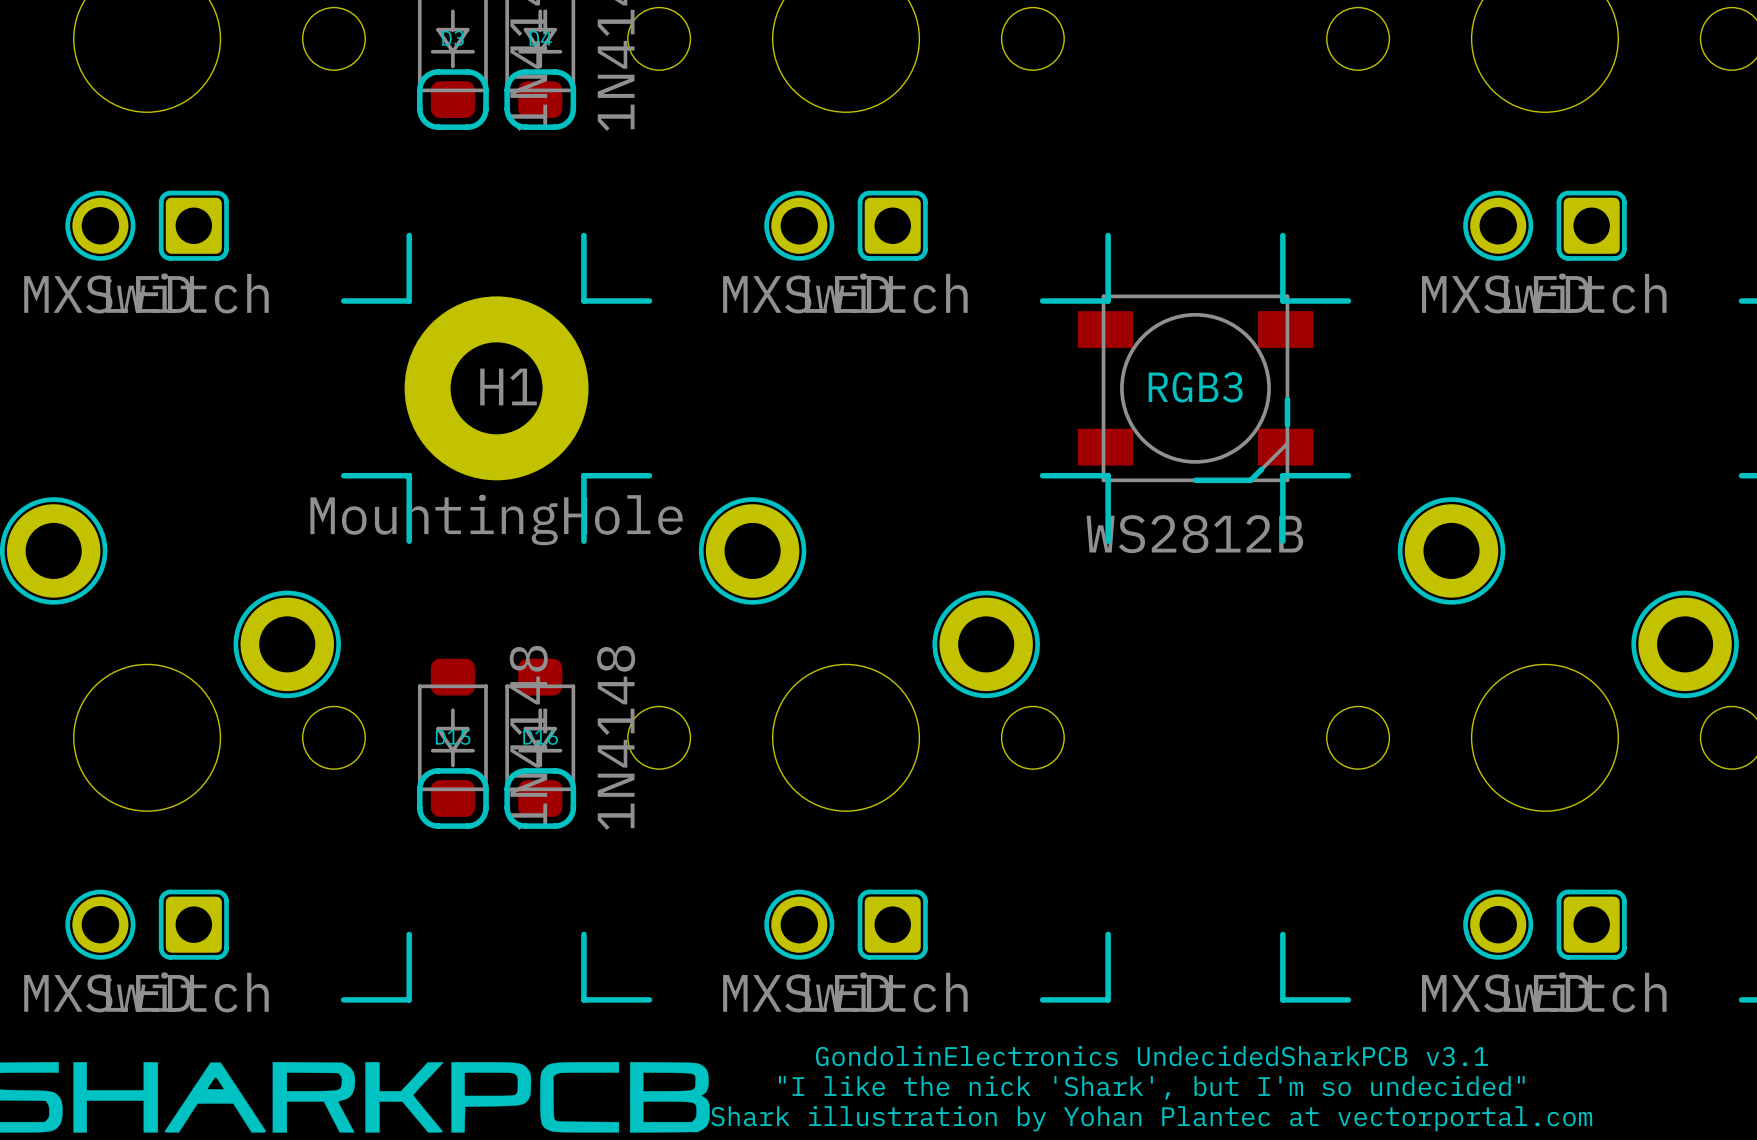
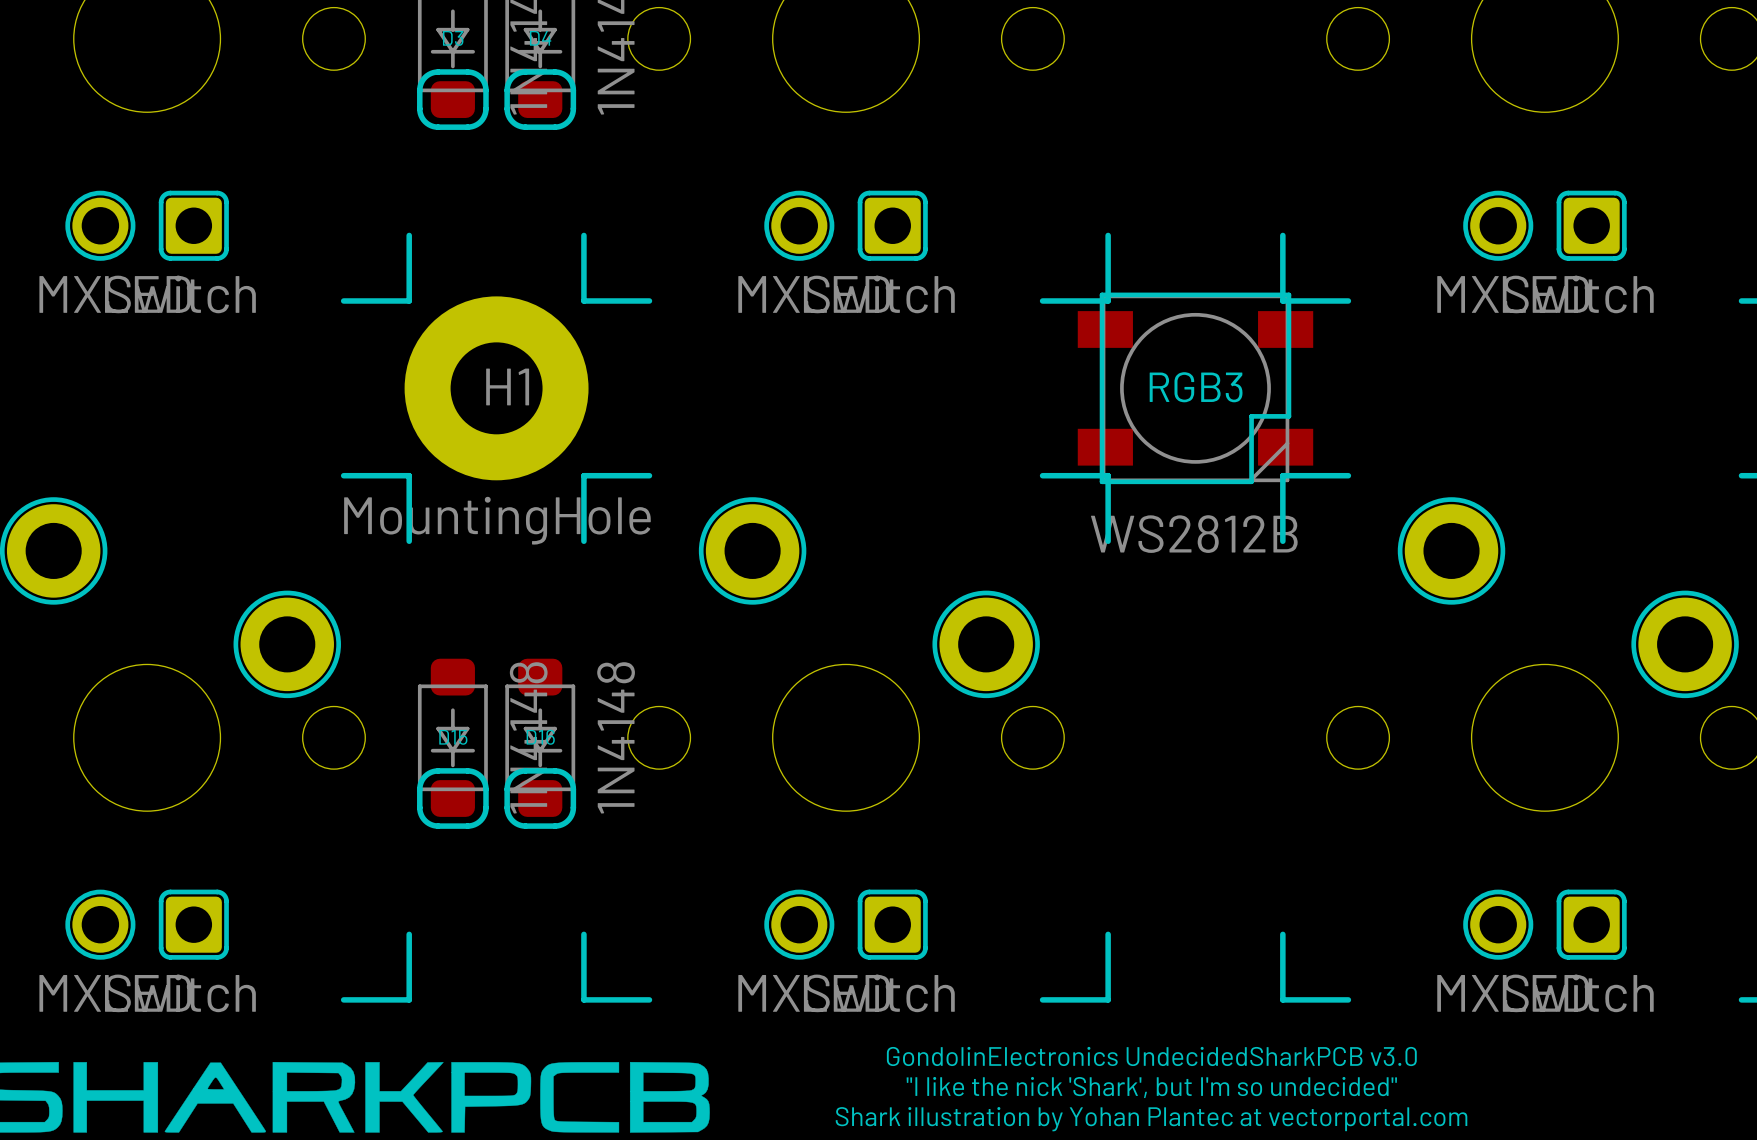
RGB3 footprint: [1077, 294, 1314, 484] -> [1077, 292, 1314, 485]
text: GondolinElectronics UndecidedSharkPCB v3.1 (1151, 1055) -> GondolinElectronics UndecidedSharkPCB v3.0 (1151, 1056)

